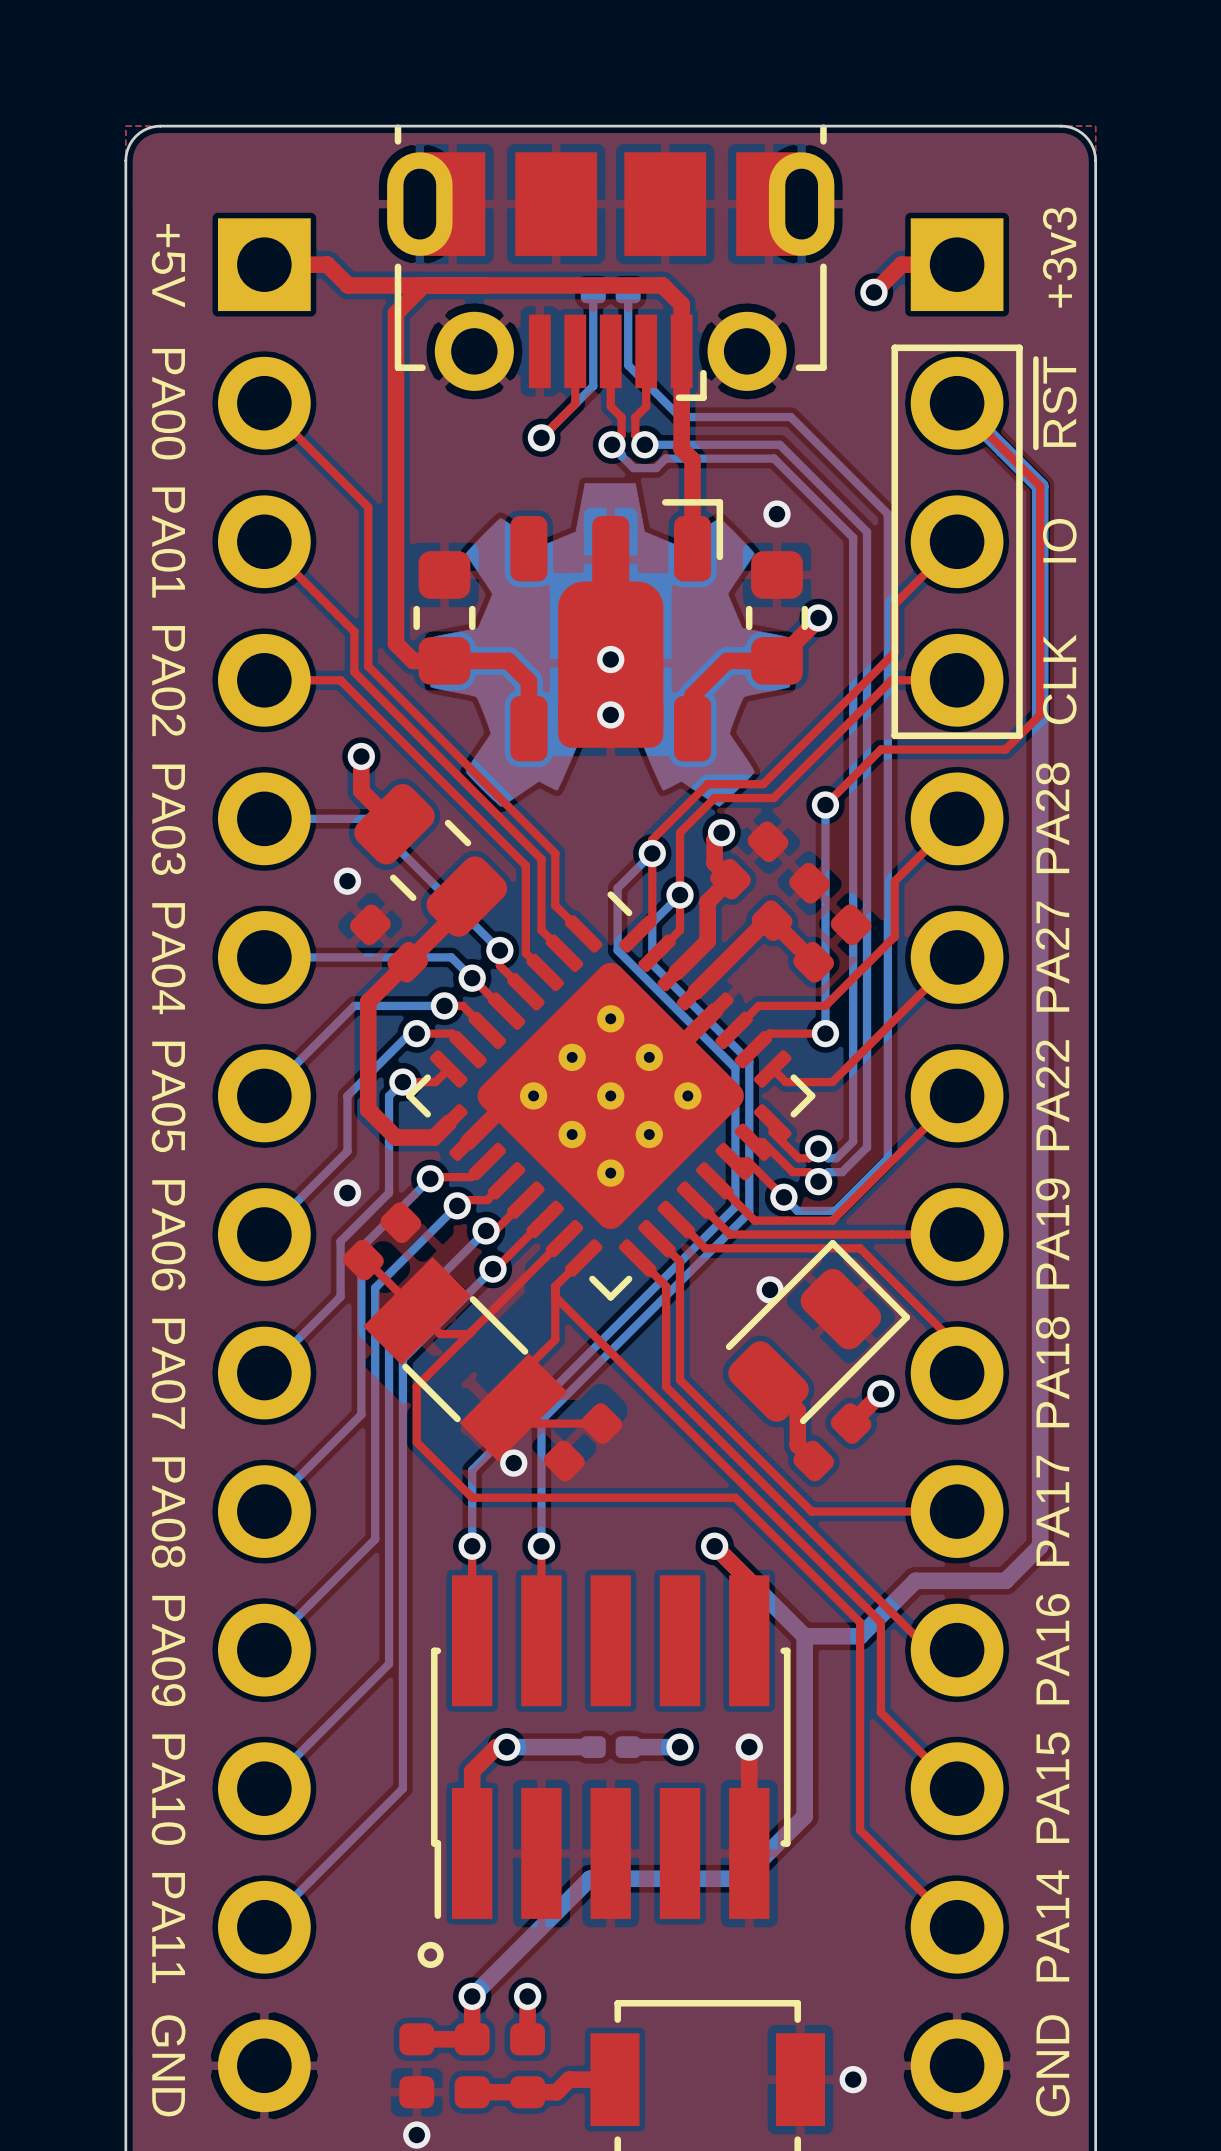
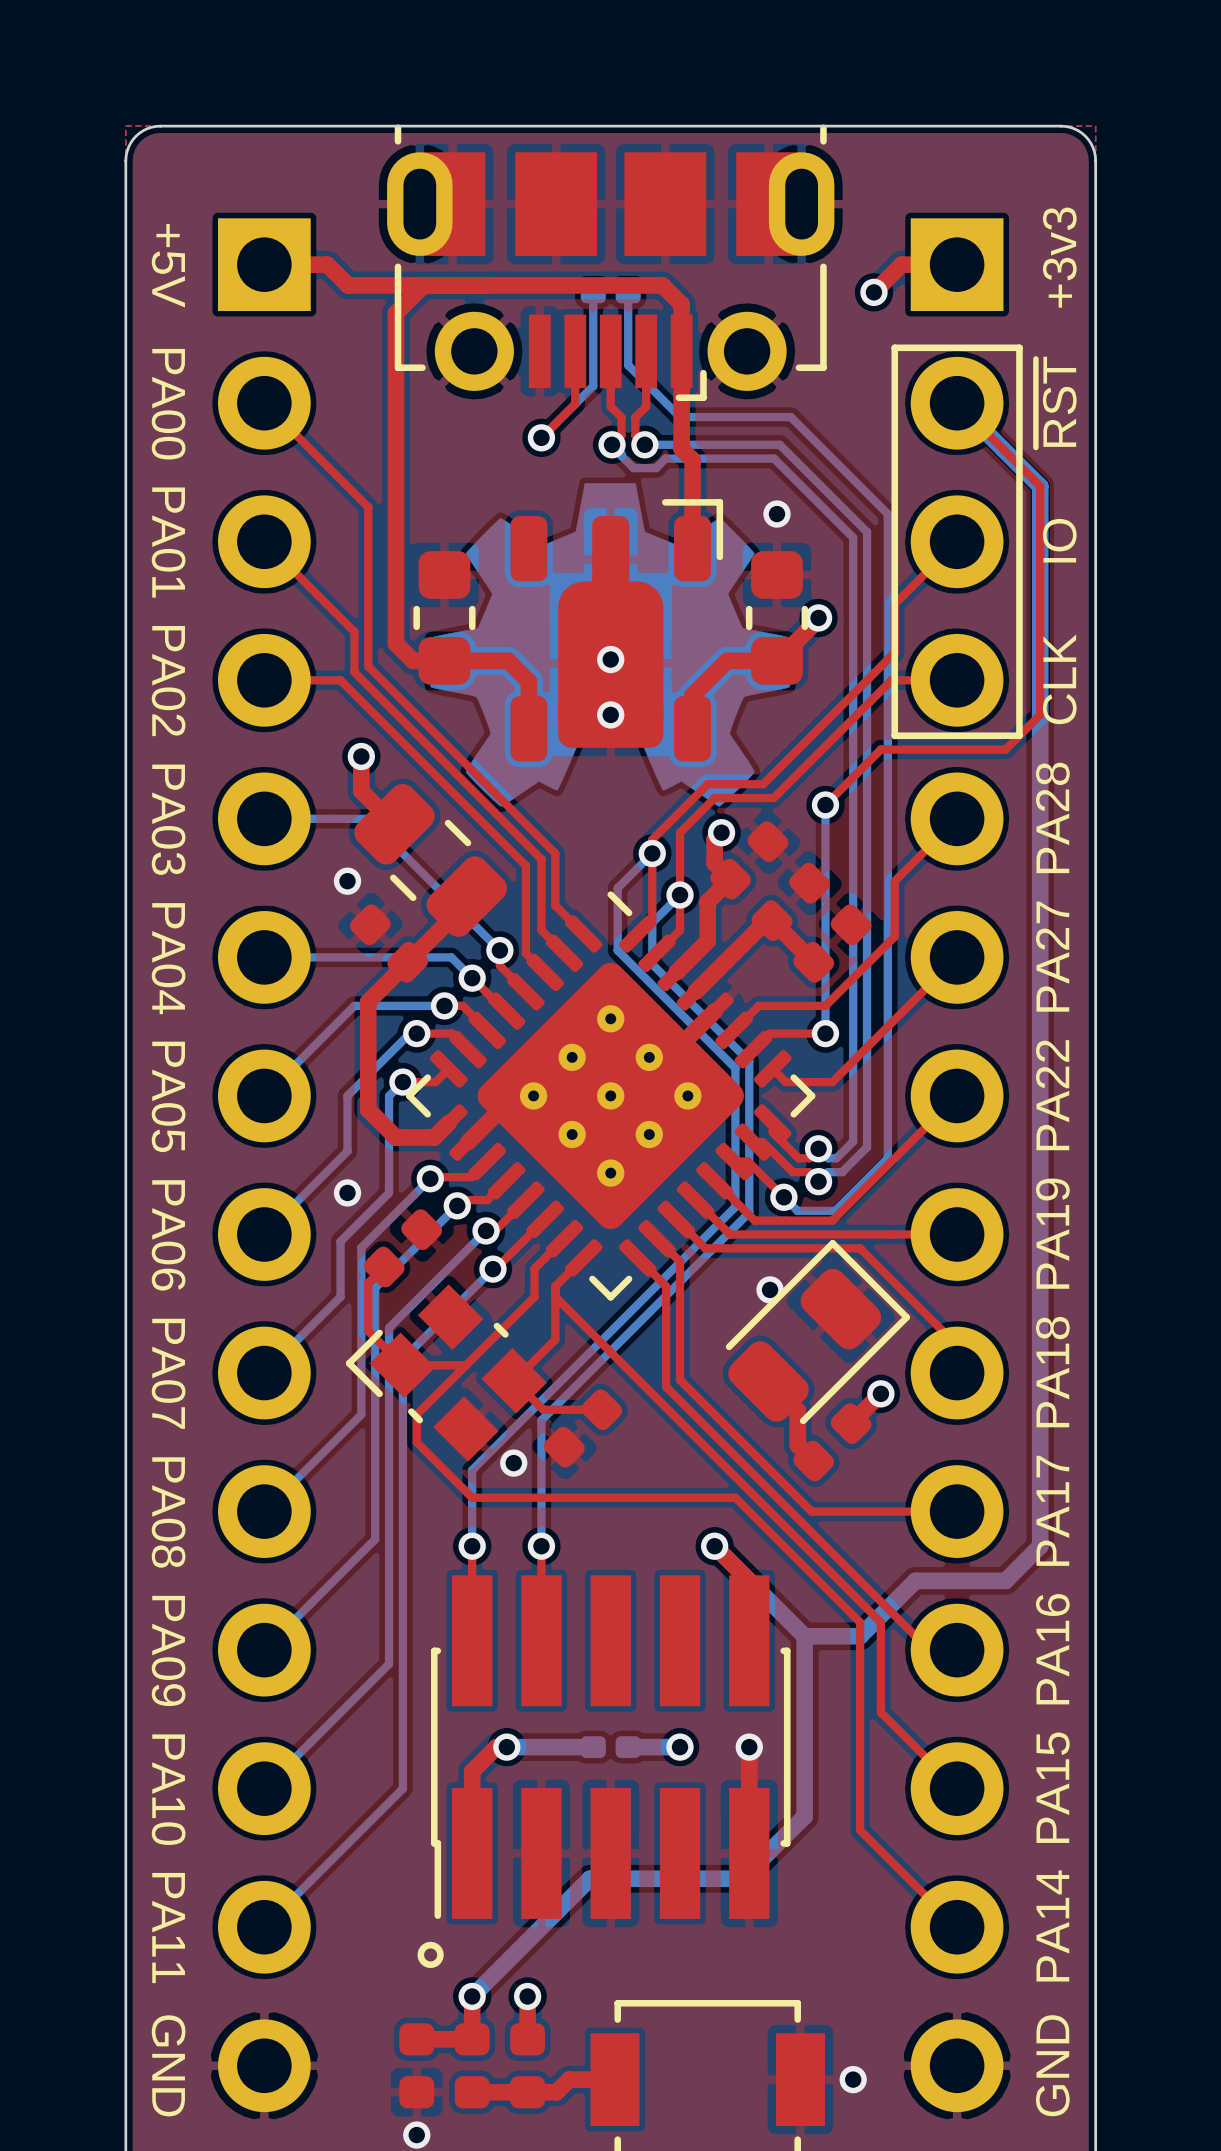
part position: (382, 1241) -> (402, 1248)
part footprint: [363, 1256, 568, 1462] -> [345, 1284, 548, 1462]
top track: (363, 1260) (366, 1260) (440, 1334) (468, 1334) -> none
top track: none -> (384, 1267) (368, 1282) (368, 1331) (402, 1365) (466, 1365)
top track: (534, 1268) (416, 1386) (416, 1414) -> (534, 1268) (534, 1296) (416, 1414)
top track: none -> (514, 1380) (543, 1409) (601, 1409)
top track: (513, 1407) (529, 1423) (601, 1423) -> none
part position: (583, 1442) -> (583, 1428)

